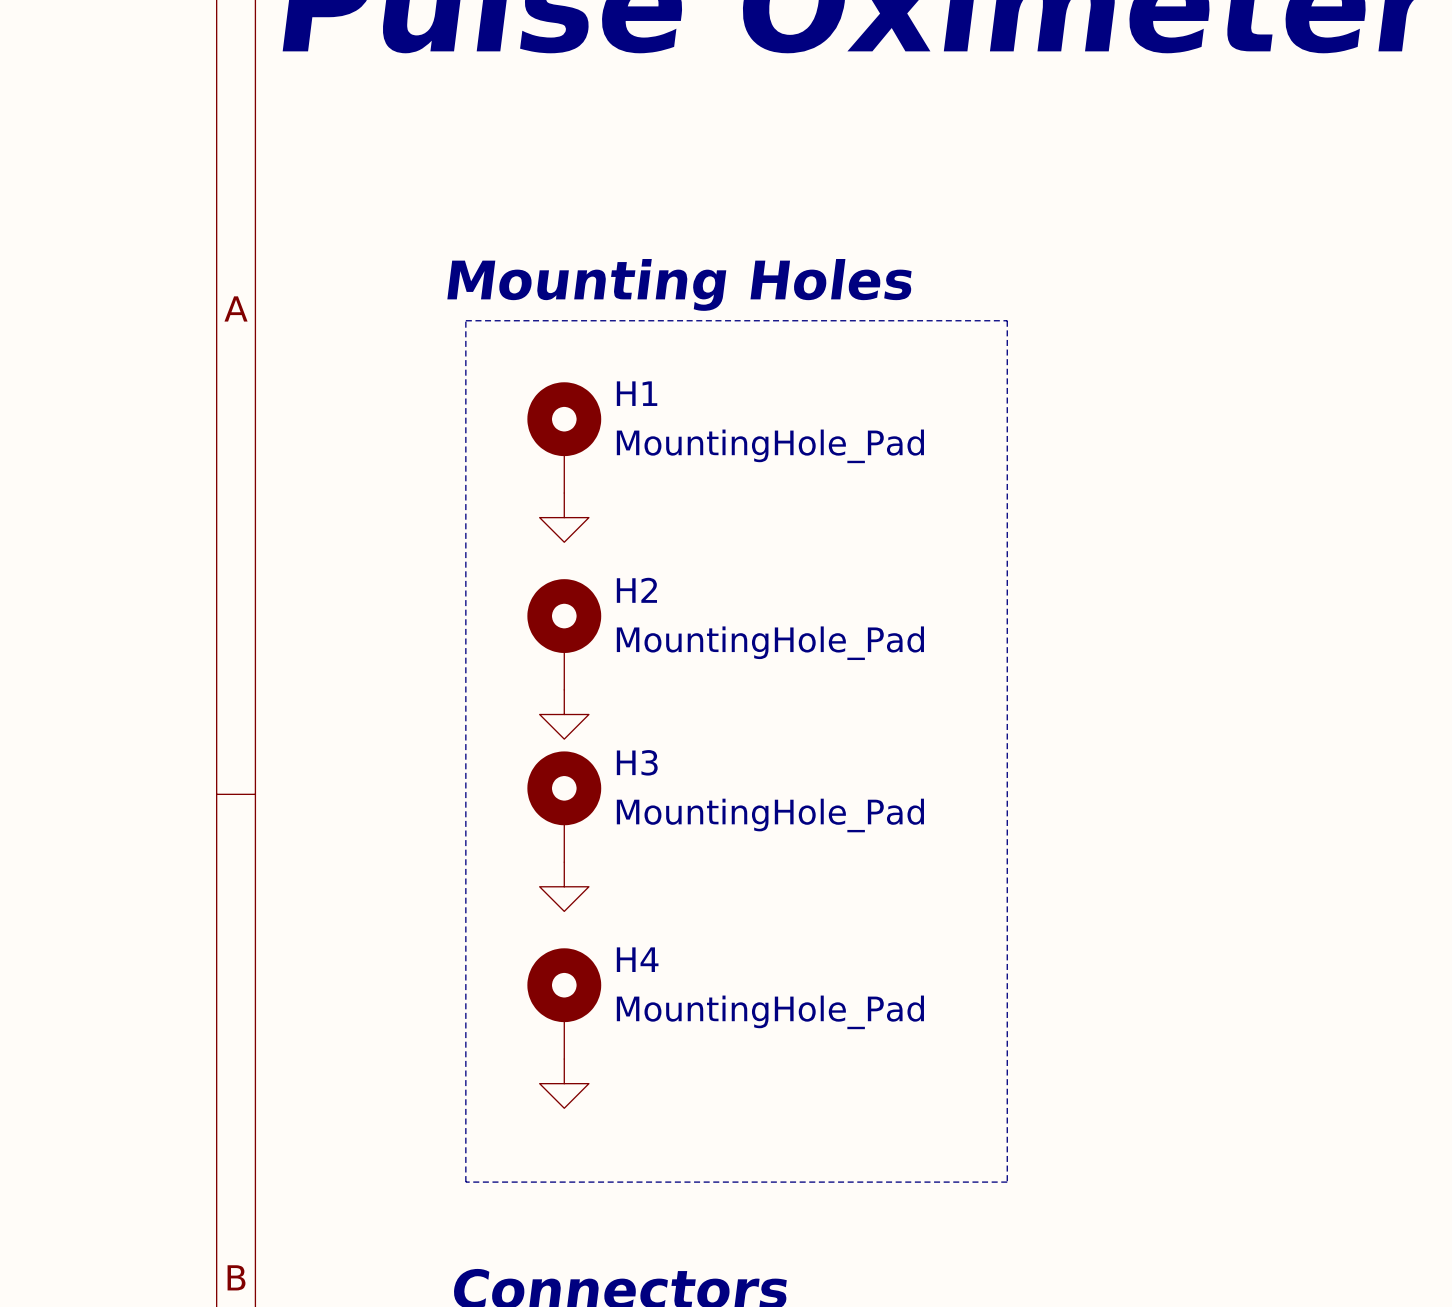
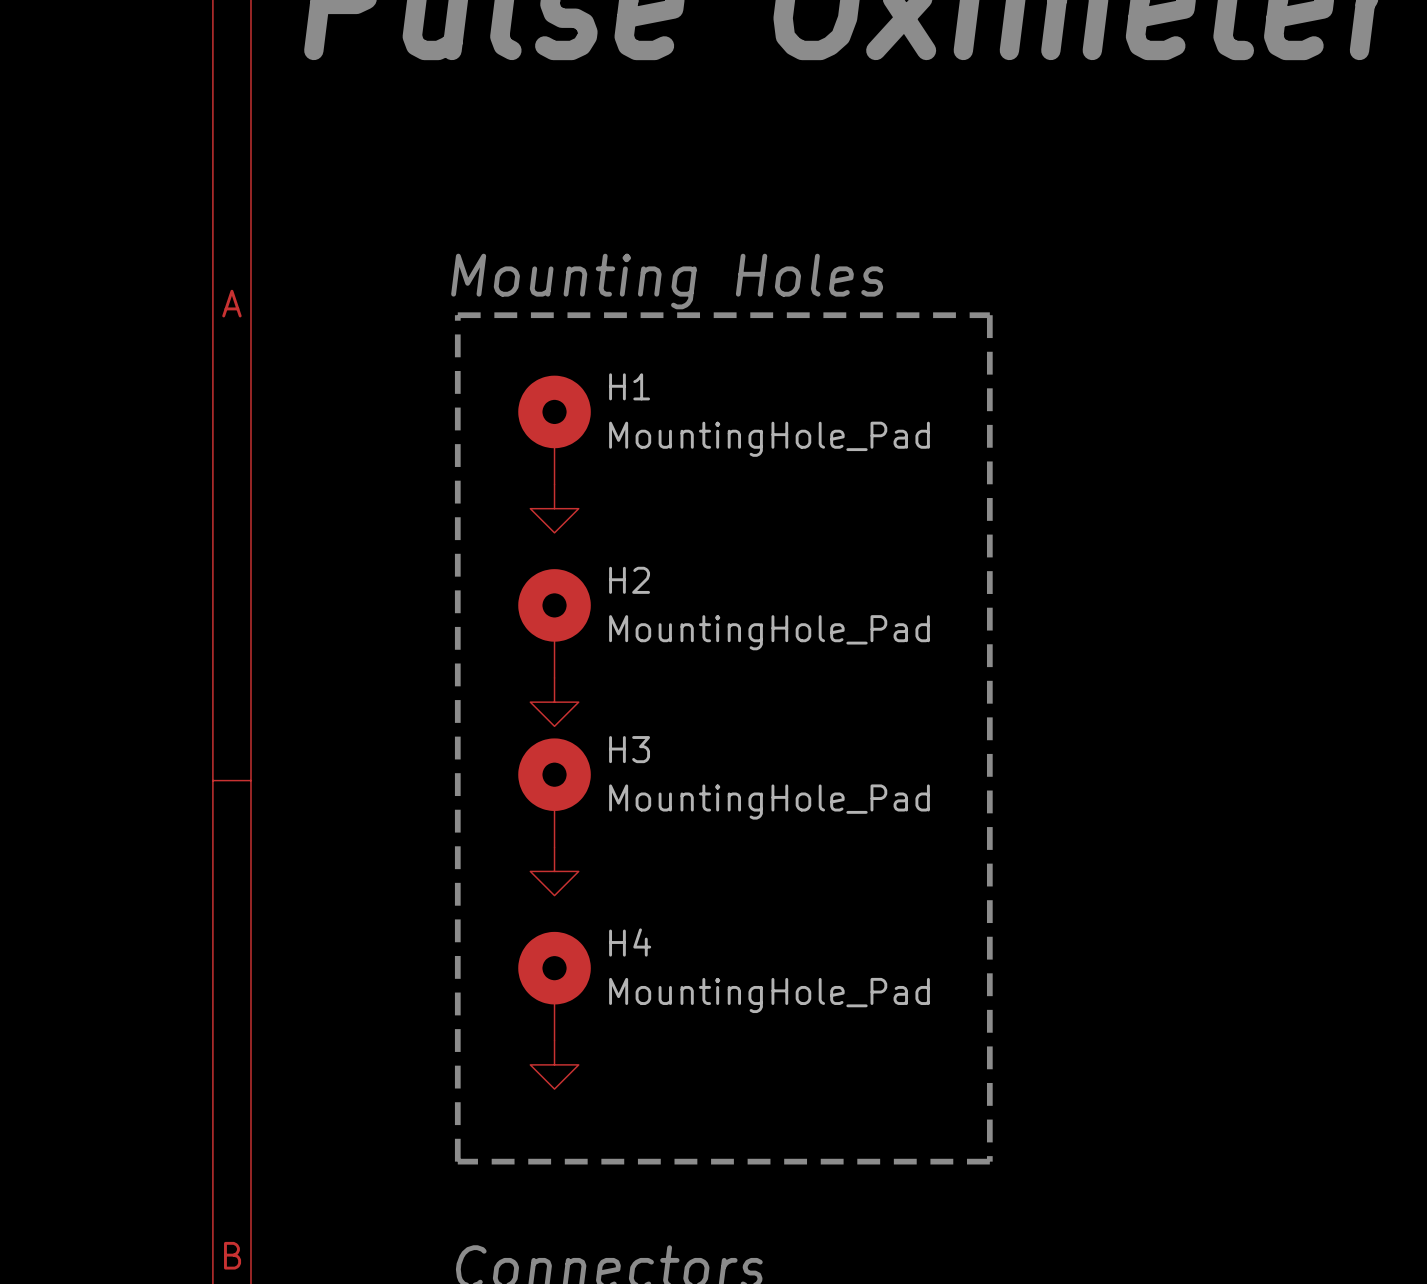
line width: thin (465, 320) (1007, 320) (1007, 1182) (465, 1182) (465, 320) -> thick (457, 315) (989, 315) (989, 1161) (457, 1161) (457, 315)

